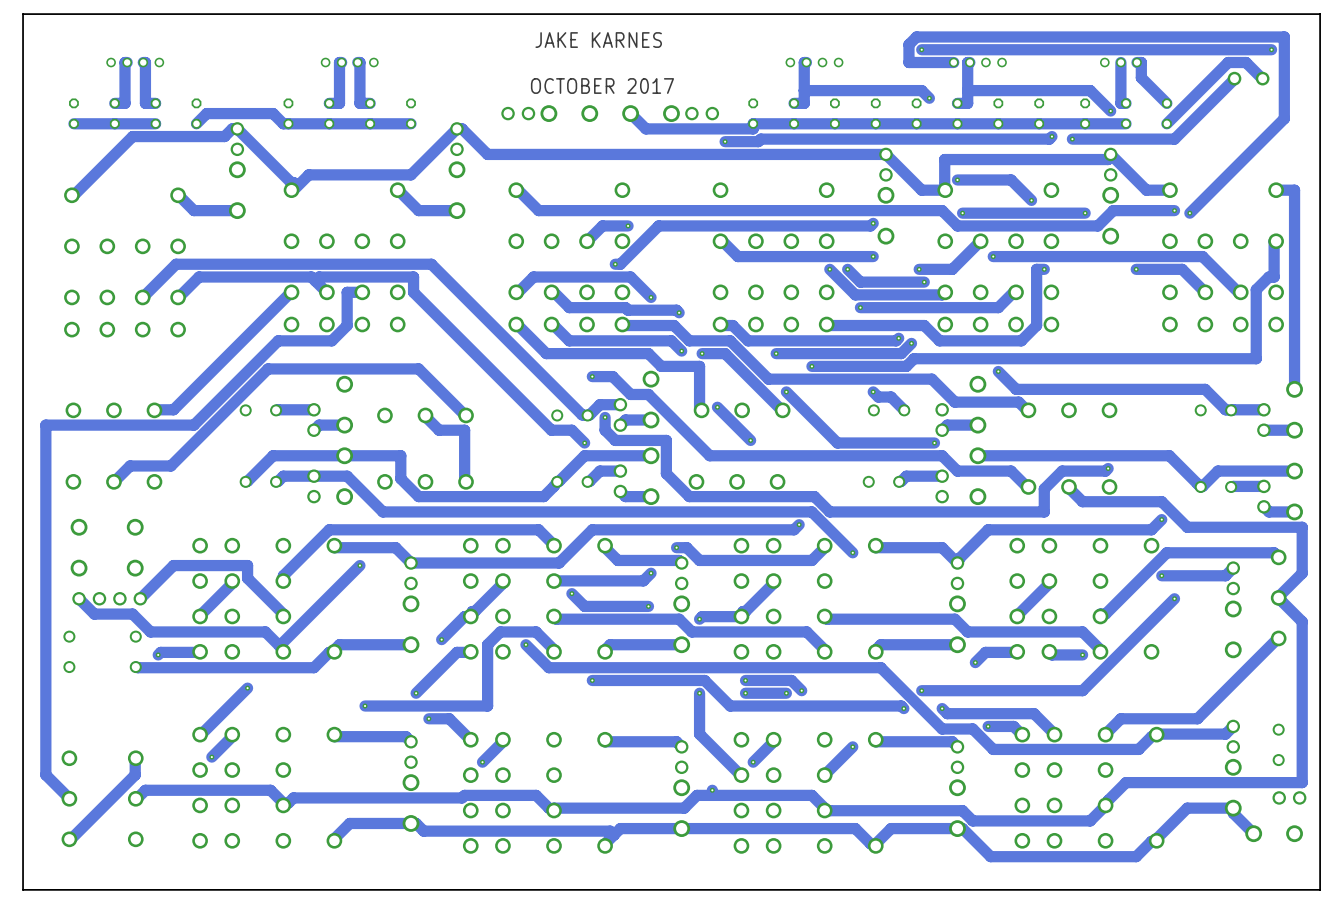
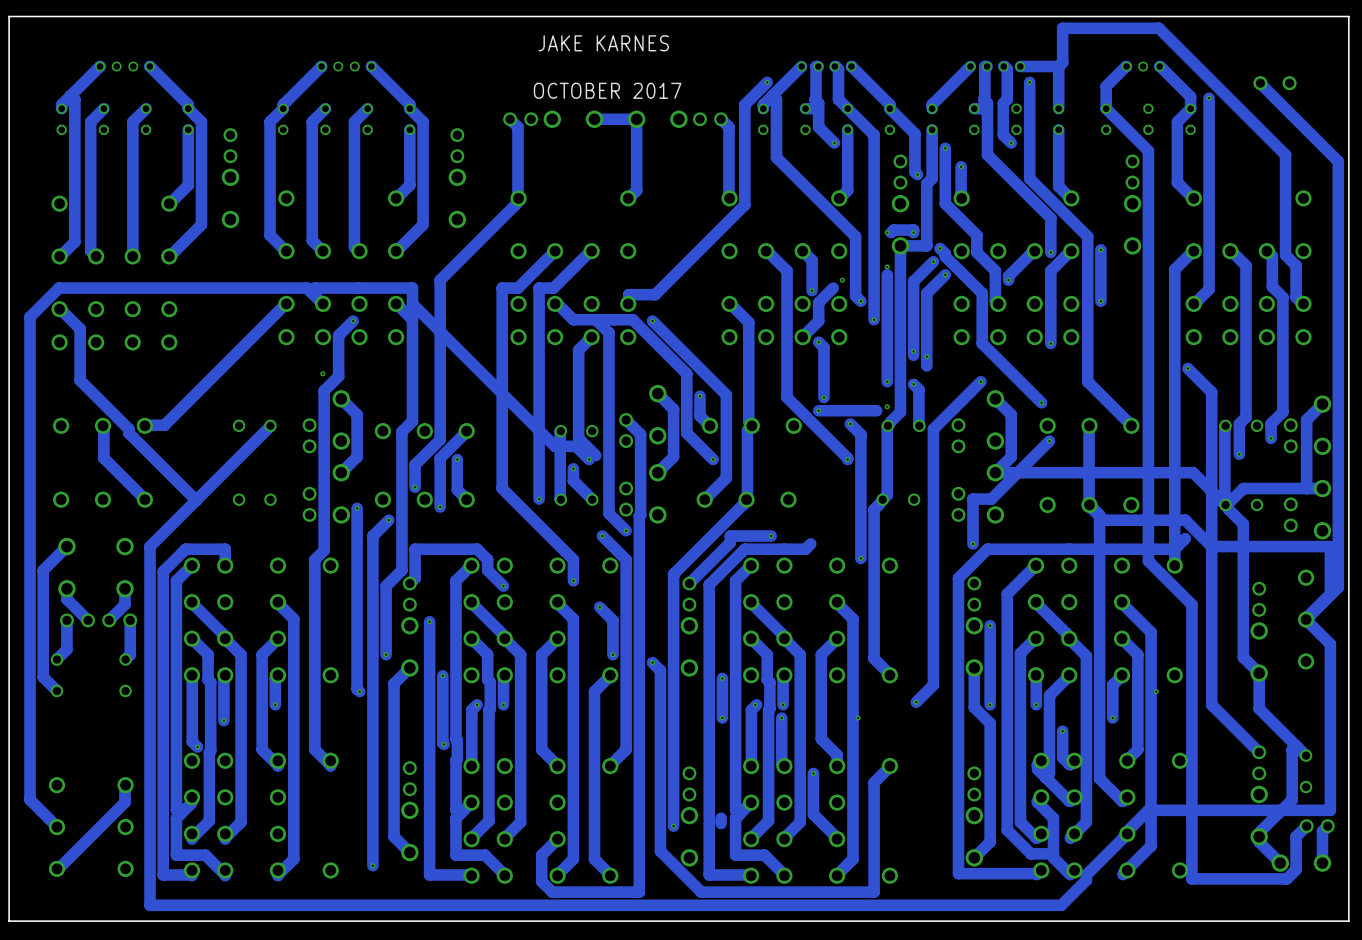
via: (921, 49) -> none
track: (1271, 49) (921, 49) -> none
via: (1271, 49) -> none
track: none -> (99, 66) (61, 104) (61, 108)
track: (127, 62) (125, 62) (125, 103) (114, 103) -> (96, 256) (90, 251) (90, 121) (103, 108)
track: (143, 62) (145, 62) (145, 103) (155, 103) -> (132, 256) (132, 121) (146, 108)
track: none -> (150, 66) (188, 104) (188, 108) (201, 121) (201, 224) (169, 256)
track: none -> (321, 66) (283, 104) (283, 108) (270, 121) (270, 235) (286, 251)
track: (341, 62) (339, 62) (339, 103) (329, 103) -> (322, 251) (312, 240) (312, 121) (325, 108)
track: (357, 62) (359, 62) (359, 103) (370, 103) -> (359, 251) (354, 247) (354, 121) (367, 108)
track: none -> (371, 66) (409, 104) (409, 108) (423, 121) (423, 224) (396, 251)
track: none -> (801, 66) (763, 104) (763, 108)
track: none -> (851, 66) (889, 104) (889, 108) (914, 133) (914, 172) (917, 174)
track: (953, 62) (908, 62) (908, 44) (916, 36) (1284, 36) (1284, 118) (1189, 213) -> (970, 66) (932, 104) (932, 108)
track: none -> (1003, 66) (1007, 69) (1007, 99) (1003, 103) (1003, 135) (1011, 143)
track: none -> (1058, 66) (1058, 108)
track: none -> (1058, 66) (1020, 66)
track: none -> (1058, 66) (1062, 62) (1062, 28) (1158, 28) (1285, 154) (1285, 255) (1296, 265) (1296, 297) (1303, 303)
track: none -> (1126, 66) (1106, 86) (1106, 108) (1148, 150) (1148, 561) (1191, 604) (1191, 878) (1286, 878) (1296, 869) (1296, 836) (1306, 826)
track: (1120, 62) (1120, 103) (1126, 103) -> none
track: (1137, 62) (1141, 62) (1141, 77) (1166, 103) -> (1160, 66) (1190, 96) (1190, 108) (1177, 121) (1177, 182) (1193, 198)
track: none -> (767, 82) (744, 104) (744, 205) (655, 294) (628, 294) (628, 303)
via: none -> (767, 82)
track: none -> (1029, 82) (1029, 178) (1087, 236) (1087, 381) (1131, 425)
via: none -> (1029, 82)
track: (1234, 78) (1174, 139) (1072, 139) -> (1260, 83) (1338, 161) (1338, 587) (1306, 619)
track: (1262, 78) (1246, 62) (1228, 62) (1166, 123) -> none
track: none -> (70, 95) (74, 99) (74, 241) (59, 256)
track: none -> (772, 95) (776, 99) (776, 157) (855, 236) (855, 296) (860, 301)
track: (804, 90) (921, 90) (929, 98) -> none
track: (967, 90) (1090, 90) (1110, 111) -> none
track: none -> (1209, 98) (1209, 289) (1193, 303)
via: none -> (1209, 98)
track: none -> (814, 99) (818, 103) (818, 127) (834, 143)
track: none -> (983, 99) (987, 103) (987, 154) (1050, 218) (1050, 252)
via: (929, 98) -> none
via: (1110, 111) -> none
track: none -> (510, 119) (517, 127) (518, 198) (516, 203) (440, 280) (440, 439) (415, 464) (415, 487)
track: none -> (594, 119) (636, 119) (636, 190) (628, 198)
track: (630, 113) (645, 128) (753, 128) (753, 123) (1126, 123) -> none
track: none -> (721, 119) (729, 127) (729, 198)
track: (155, 123) (73, 123) -> none
track: (411, 123) (283, 123) (273, 113) (206, 113) (196, 123) -> none
track: none -> (847, 129) (847, 190) (839, 198)
track: none -> (932, 129) (932, 178) (926, 183) (926, 245) (900, 245) (900, 412) (887, 426) (887, 495) (874, 509) (874, 658) (889, 674)
track: none -> (1058, 129) (1058, 186) (1071, 198)
via: none -> (834, 143)
via: none -> (1011, 143)
track: (1051, 136) (1049, 139) (760, 139) (758, 141) (725, 141) -> none
via: (1051, 136) -> none
via: (1072, 139) -> none
via: (725, 141) -> none
track: none -> (945, 148) (945, 203) (976, 235) (976, 252) (995, 270) (995, 301) (998, 303)
via: none -> (945, 148)
track: (944, 159) (1108, 159) (1110, 154) (1146, 190) (1169, 190) -> none
via: none -> (961, 166)
via: none -> (917, 174)
track: (957, 179) (1011, 179) (1031, 200) -> none
via: (957, 179) -> none
track: (398, 190) (418, 210) (456, 210) -> (396, 198) (409, 185) (409, 129)
track: (516, 190) (538, 210) (942, 210) (957, 225) (1097, 225) (1113, 210) (1174, 210) -> none
track: (944, 190) (921, 190) (885, 154) (487, 154) (462, 128) (456, 128) (411, 174) (308, 174) (291, 190) (293, 182) (290, 182) (237, 128) (232, 128) (224, 136) (132, 136) (71, 195) -> none
track: (1276, 190) (1294, 190) (1294, 389) -> (1306, 488) (1306, 419) (1322, 404)
track: (178, 195) (193, 210) (237, 210) -> (169, 203) (188, 185) (188, 129)
via: (1031, 200) -> none
via: (1174, 210) -> none
via: (962, 213) -> none
track: (1085, 213) (962, 213) -> none
via: (1085, 213) -> none
via: (1189, 213) -> none
track: (873, 223) (870, 225) (658, 225) (620, 264) (615, 264) -> none
track: none -> (913, 232) (913, 230) (893, 230) (891, 232)
via: none -> (913, 232)
track: (628, 225) (602, 225) (587, 241) -> none
via: (628, 225) -> none
track: none -> (940, 248) (945, 256) (982, 293) (982, 343) (1041, 402)
via: none -> (940, 248)
track: none -> (1100, 249) (1100, 301)
via: none -> (1100, 249)
track: none -> (555, 251) (517, 288) (502, 288) (502, 488) (573, 559) (573, 580)
track: (720, 241) (737, 256) (873, 256) -> none
track: none -> (766, 251) (787, 270) (787, 397) (847, 459)
track: none -> (802, 251) (812, 260) (812, 290)
track: (980, 241) (952, 269) (919, 269) -> none
track: none -> (1034, 251) (1008, 276) (1008, 280)
track: none -> (1071, 251) (1050, 270) (1050, 343)
track: none -> (1193, 251) (1174, 269) (1174, 565)
track: none -> (1230, 251) (1245, 265) (1245, 417) (1239, 423) (1239, 454)
track: (1276, 241) (1274, 241) (1274, 277) (1269, 277) (1256, 289) -> (1266, 251) (1272, 256) (1272, 286) (1282, 297) (1282, 301)
via: none -> (1050, 252)
track: none -> (933, 261) (913, 281) (913, 355)
via: none -> (933, 261)
track: (993, 256) (1202, 256) (1238, 292) (1240, 292) -> none
via position: (993, 256) -> (1008, 280)
via: (615, 264) -> none
track: none -> (887, 274) (887, 381)
track: none -> (945, 274) (926, 293) (926, 365)
via: none -> (945, 274)
track: (829, 269) (855, 294) (942, 294) (945, 292) -> none
track: (847, 269) (860, 282) (924, 282) -> none
via position: (847, 269) -> (860, 301)
via: (919, 269) -> none
track: (1044, 269) (1036, 269) (1036, 325) (1021, 340) (939, 340) (924, 325) (826, 324) -> none
via: (1044, 269) -> none
track: (1136, 269) (1182, 269) (1205, 292) -> none
via: (1136, 269) -> none
track: (199, 277) (178, 297) -> none
track: (536, 277) (533, 277) (516, 292) -> (539, 288) (539, 499)
track: (550, 277) (630, 277) (651, 297) -> (553, 288) (591, 251)
track: none -> (833, 288) (818, 302) (818, 321) (802, 337)
via: none -> (812, 290)
via: (924, 282) -> none
via: none -> (1100, 301)
track: (361, 292) (347, 292) (347, 325) (331, 340) (278, 340) (193, 425) (45, 425) (45, 774) -> (190, 288) (59, 288) (30, 317) (30, 799) (32, 802)
track: none -> (396, 303) (412, 319) (412, 421) (401, 431) (401, 570) (386, 586) (386, 654)
track: none -> (729, 303) (748, 322) (748, 421) (751, 425) (747, 430) (747, 499) (673, 574) (673, 826)
track: (1016, 292) (1013, 292) (998, 307) (860, 307) -> (834, 66) (838, 69) (838, 99) (874, 135) (874, 319)
track: none -> (59, 309) (80, 328) (80, 380) (128, 429) (128, 433) (196, 500)
track: (142, 297) (176, 264) (431, 264) (582, 414) (589, 414) (599, 404) (620, 404) -> (557, 839) (541, 855) (541, 881) (552, 892) (639, 892) (640, 434) (626, 419)
via position: (651, 297) -> (652, 321)
track: none -> (595, 319) (608, 332) (608, 513) (626, 530)
track: (625, 307) (628, 310) (676, 310) (679, 312) -> (631, 319) (686, 373) (686, 433) (713, 459)
track: none -> (353, 321) (338, 335) (338, 376) (324, 390) (324, 550)
via: none -> (353, 321)
track: none -> (652, 321) (726, 394) (726, 478) (704, 499)
via: (679, 312) -> none
track: (516, 324) (546, 353) (648, 353) (661, 366) (699, 366) (699, 409) (701, 410) -> (699, 396) (699, 416) (710, 425)
track: (551, 324) (569, 340) (671, 340) (681, 351) -> none
track: none -> (591, 337) (578, 350) (578, 438) (595, 455)
track: (622, 324) (674, 325) (689, 340) (730, 340) (768, 379) (931, 379) (954, 402) (1018, 402) (1028, 410) -> none
track: (720, 324) (732, 325) (748, 340) (896, 340) (898, 338) -> none
track: none -> (818, 342) (823, 347) (823, 397)
via: none -> (818, 342)
via: none -> (1050, 343)
track: (911, 343) (901, 353) (776, 353) -> none
via: (681, 351) -> none
track: (702, 353) (725, 353) (782, 410) -> none
via: (702, 353) -> none
via: (776, 353) -> none
via: none -> (1187, 368)
track: (1256, 358) (914, 358) (906, 366) (811, 366) -> (1282, 372) (1282, 412) (1271, 423) (1271, 438)
via: none -> (322, 373)
via: (811, 366) -> none
via: none -> (887, 381)
track: none -> (980, 381) (933, 429) (933, 685) (916, 702)
via: none -> (980, 381)
via: none -> (913, 384)
track: (998, 371) (1016, 389) (1205, 389) (1225, 409) (1263, 409) -> none
via: (998, 371) -> none
track: (592, 376) (612, 376) (630, 394) (648, 394) (709, 455) (942, 455) (957, 471) (1011, 471) (1028, 486) -> none
via: (592, 376) -> none
via: none -> (699, 396)
via: none -> (823, 397)
track: none -> (341, 398) (357, 414) (357, 456) (341, 472)
track: none -> (995, 398) (1011, 414) (1011, 456) (995, 472)
via: none -> (1041, 402)
track: (786, 391) (837, 442) (934, 442) -> none
via: (786, 391) -> none
track: (873, 391) (878, 397) (891, 397) (903, 409) -> (913, 384) (918, 389) (918, 425)
via: none -> (818, 410)
track: none -> (876, 410) (818, 410)
track: (717, 407) (750, 440) -> none
via: (717, 407) -> none
track: none -> (850, 423) (860, 434) (860, 558)
via: none -> (850, 423)
track: (313, 409) (276, 410) -> none
track: none -> (103, 425) (103, 458) (144, 499)
track: none -> (1089, 425) (1089, 504) (1099, 514) (1099, 778) (1123, 801)
track: none -> (1225, 425) (1224, 504) (1243, 524) (1243, 657) (1259, 673) (1259, 708) (1306, 755)
track: (425, 415) (439, 430) (464, 430) (466, 481) -> (457, 459) (457, 489) (466, 499)
track: (466, 415) (418, 368) (268, 368) (170, 465) (130, 465) (113, 481) -> (466, 431) (440, 458) (440, 507)
track: none -> (560, 431) (560, 499)
track: (605, 417) (605, 430) (615, 440) (666, 440) (666, 473) (689, 496) (814, 496) (829, 511) (1044, 511) (1044, 488) (1062, 471) (1105, 471) (1108, 468) -> none
via: (605, 417) -> none
track: (651, 420) (625, 420) (620, 425) -> none
via: none -> (1271, 438)
track: (344, 425) (319, 425) (313, 430) -> none
track: (977, 425) (947, 425) (942, 430) -> none
track: none -> (1049, 441) (991, 499) (972, 499) (972, 543)
via: none -> (1049, 441)
track: (1294, 430) (1263, 430) -> none
via: none -> (1239, 454)
via: (750, 440) -> none
via: none -> (457, 459)
via: none -> (713, 459)
via: none -> (847, 459)
via: (934, 442) -> none
via: none -> (573, 468)
track: (651, 455) (584, 455) (543, 496) (418, 496) (400, 478) (400, 455) (273, 455) (245, 481) -> (657, 472) (673, 456) (673, 409) (657, 393)
via: (1108, 468) -> none
via: none -> (415, 487)
track: (620, 471) (599, 471) (587, 481) -> (573, 468) (573, 480) (592, 499)
track: (942, 476) (906, 476) (899, 481) -> none
track: (276, 481) (283, 476) (347, 476) (382, 511) (811, 511) (852, 552) -> none
via: none -> (539, 499)
track: (1263, 486) (1231, 486) -> none
via: none -> (440, 507)
track: none -> (357, 508) (357, 689) (359, 691)
via: none -> (357, 508)
track: (620, 491) (625, 496) (651, 496) -> none
track: none -> (388, 520) (372, 536) (372, 865)
via: none -> (388, 520)
track: (1263, 506) (1269, 511) (1294, 511) -> none
via: none -> (626, 530)
via: none -> (602, 536)
via: none -> (771, 536)
via: (1161, 519) -> none
via: (799, 524) -> none
via: none -> (972, 543)
track: none -> (66, 546) (43, 570) (43, 677) (56, 690)
track: (416, 529) (328, 531) -> (415, 549) (415, 578) (409, 583)
track: (476, 529) (538, 529) (554, 545) -> (477, 549) (487, 559) (487, 570) (503, 586)
track: (735, 529) (592, 529) (559, 563) (411, 563) (395, 547) (334, 547) (334, 545) -> (744, 549) (709, 584) (709, 874) (751, 875)
track: (988, 529) (960, 557) (957, 563) (942, 547) (875, 547) (875, 545) -> (1005, 549) (987, 549) (958, 578) (958, 873) (1037, 874)
track: (319, 540) (283, 575) (283, 581) -> (314, 559) (314, 749) (330, 766)
track: none -> (191, 565) (176, 580) (176, 810) (180, 814)
track: none -> (225, 565) (225, 549) (185, 549) (163, 571) (163, 874) (191, 875)
track: none -> (471, 565) (456, 580) (456, 810) (459, 814)
track: (605, 545) (617, 560) (679, 560) (681, 563) -> (771, 536) (730, 536) (730, 542) (689, 583)
track: none -> (751, 565) (735, 580) (735, 810) (739, 814)
track: (824, 545) (811, 560) (699, 560) (686, 547) (676, 547) -> none
track: none -> (1036, 565) (1007, 594) (1007, 830) (1031, 853) (1053, 853)
via: (676, 547) -> none
via position: (852, 552) -> (860, 558)
track: (1278, 557) (1274, 552) (1166, 552) (1105, 614) (1100, 614) (1100, 616) -> none
via: none -> (573, 580)
track: (359, 565) (279, 646) -> none
via: (359, 565) -> none
via: none -> (503, 586)
track: none -> (66, 588) (66, 599) (88, 620)
track: none -> (124, 588) (124, 604) (109, 620)
track: (1233, 568) (1225, 575) (1161, 575) -> none
track: (651, 573) (643, 580) (554, 581) -> (557, 875) (573, 859) (573, 619) (557, 602)
via: (651, 573) -> none
via: (1161, 575) -> none
track: none -> (191, 602) (241, 654) (241, 822) (225, 839)
track: (232, 581) (232, 583) (200, 616) -> (191, 839) (209, 820) (210, 750) (210, 682) (208, 679) (208, 654) (191, 638)
track: none -> (277, 602) (293, 619) (293, 859) (277, 875)
track: none -> (471, 602) (520, 654) (520, 822) (504, 839)
track: (502, 581) (502, 583) (474, 611) (472, 611) (470, 616) (464, 616) (441, 639) -> none
track: none -> (751, 602) (800, 654) (800, 822) (784, 839)
track: (773, 581) (773, 583) (745, 611) (742, 611) (741, 616) (702, 616) (699, 619) -> none
track: none -> (837, 602) (852, 619) (852, 859) (837, 875)
track: none -> (1036, 602) (1086, 656) (1086, 822) (1070, 838)
track: (1049, 581) (1049, 583) (1017, 616) -> (1037, 838) (1020, 822) (1020, 653) (1036, 638)
track: none -> (1122, 602) (1151, 632) (1151, 845) (1123, 874)
track: none -> (599, 607) (612, 620) (612, 654)
via: none -> (599, 607)
track: (571, 593) (584, 606) (648, 606) -> none
via: (571, 593) -> none
track: (79, 598) (94, 614) (132, 614) (150, 631) (265, 631) (283, 651) -> (66, 620) (66, 649) (56, 659)
track: (140, 598) (173, 565) (247, 565) (247, 578) (283, 614) (283, 616) -> (130, 620) (130, 654) (125, 659)
track: (1174, 598) (1082, 690) (921, 690) -> none
via: (1174, 598) -> none
track: none -> (429, 621) (429, 874) (471, 875)
via: none -> (429, 621)
track: none -> (990, 625) (990, 704)
via: none -> (990, 625)
via: (648, 606) -> none
track: none -> (277, 638) (262, 654) (262, 749) (277, 766)
track: (554, 616) (556, 619) (679, 619) (691, 631) (806, 631) (824, 651) -> (557, 638) (541, 654) (541, 749) (557, 766)
track: none -> (751, 638) (767, 654) (767, 679) (769, 682) (768, 820) (751, 839)
track: (824, 616) (827, 619) (954, 619) (967, 631) (1082, 631) (1100, 651) -> (1112, 718) (1112, 685) (1122, 675)
track: none -> (837, 638) (821, 654) (821, 739) (837, 754) (837, 766)
via: (699, 619) -> none
via: none -> (386, 654)
via: none -> (612, 654)
track: (1278, 638) (1197, 718) (1120, 718) (1115, 723) -> (1122, 638) (1137, 654) (1137, 749)
via position: (441, 639) -> (442, 675)
via: none -> (652, 662)
track: (411, 644) (339, 644) (334, 651) (329, 652) (313, 667) (135, 667) -> (409, 667) (394, 683) (394, 836) (409, 852)
track: (525, 644) (548, 667) (880, 667) (942, 728) (972, 728) (993, 749) (1138, 749) (1156, 734) (1225, 734) (1233, 726) -> (1187, 368) (1211, 392) (1211, 704) (1259, 752)
via: (525, 644) -> none
track: (681, 644) (610, 644) (605, 651) -> (610, 874) (594, 859) (594, 691) (610, 675)
track: (957, 644) (880, 644) (875, 651) -> (974, 667) (974, 707) (990, 723) (990, 841) (974, 857)
track: (200, 651) (160, 652) (158, 654) -> (191, 675) (192, 741) (197, 747)
track: none -> (225, 675) (223, 720)
track: none -> (277, 675) (275, 678) (275, 704)
track: (470, 651) (456, 652) (416, 693) -> none
track: none -> (504, 675) (503, 704)
track: (554, 651) (536, 631) (500, 631) (487, 644) (487, 685) -> (471, 638) (487, 654) (487, 679) (490, 682) (488, 710)
track: none -> (784, 675) (783, 704)
track: (1017, 651) (985, 652) (975, 662) -> (1036, 675) (1036, 704)
track: none -> (442, 675) (444, 744)
track: (1049, 652) (1051, 654) (1082, 654) -> (1069, 675) (1049, 695) (1049, 773) (1045, 777)
via: (158, 654) -> none
track: none -> (722, 678) (722, 718)
via: none -> (722, 678)
via: (1082, 654) -> none
via position: (975, 662) -> (990, 704)
via: none -> (359, 691)
via: none -> (1156, 691)
via: none -> (916, 702)
via: none -> (275, 704)
via: none -> (477, 704)
via: none -> (503, 704)
track: (592, 680) (704, 680) (730, 706) (901, 706) (903, 708) -> none
via: (592, 680) -> none
track: (745, 680) (791, 680) (801, 690) -> none
track: none -> (756, 704) (751, 710) (751, 766)
via: none -> (783, 704)
via: none -> (1036, 704)
track: (247, 688) (200, 734) -> none
via: (247, 688) -> none
via: (801, 690) -> none
via: (921, 690) -> none
via: (416, 693) -> none
track: (699, 693) (699, 734) (741, 775) -> (784, 875) (764, 855) (735, 855) (735, 818) (751, 802)
via position: (699, 693) -> (722, 718)
via: (745, 693) -> none
via: none -> (781, 718)
track: (786, 693) (745, 693) -> none
via: (786, 693) -> none
via: none -> (858, 718)
via: none -> (1112, 718)
via: none -> (223, 720)
via: (365, 706) -> none
track: (487, 706) (365, 706) -> (488, 731) (488, 820) (471, 839)
track: none -> (1062, 731) (1062, 757) (1070, 765)
via: none -> (1062, 731)
via: (903, 708) -> none
track: (942, 708) (947, 713) (1034, 713) (1054, 734) -> none
via: (942, 708) -> none
track: (428, 718) (449, 718) (470, 739) -> (477, 704) (471, 710) (471, 766)
via position: (428, 718) -> (444, 744)
via: none -> (197, 747)
track: (988, 726) (1013, 726) (1022, 734) -> none
via: (988, 726) -> none
track: (232, 734) (211, 757) -> none
track: (334, 734) (334, 736) (405, 736) (411, 741) -> none
track: none -> (1037, 765) (1037, 769) (1070, 801)
track: (502, 739) (482, 762) -> none
track: (605, 739) (605, 741) (676, 741) (681, 746) -> (610, 766) (626, 749) (626, 559) (602, 536)
track: (773, 739) (753, 762) -> (784, 766) (781, 762) (781, 718)
track: (875, 740) (952, 741) (957, 746) -> (889, 766) (874, 782) (874, 892) (701, 892) (660, 851) (660, 670) (652, 662)
via: none -> (813, 773)
track: (852, 746) (824, 775) -> none
via: (852, 746) -> none
via: (211, 757) -> none
via: (482, 762) -> none
via: (753, 762) -> none
track: none -> (1037, 801) (1053, 818) (1053, 857) (1070, 874)
track: none -> (191, 802) (176, 818) (176, 855) (205, 855) (225, 875)
track: none -> (471, 802) (456, 818) (456, 855) (485, 855) (504, 875)
via position: (712, 790) -> (673, 826)
track: none -> (1327, 826) (1322, 831) (1322, 863)
track: (135, 798) (145, 790) (270, 790) (283, 803) (283, 805) (293, 797) (462, 797) (464, 795) (536, 795) (554, 810) (554, 808) (684, 808) (697, 795) (811, 795) (824, 809) -> (813, 773) (813, 814) (837, 838)
track: (1233, 808) (1187, 808) (1156, 840) (1151, 841) (1136, 856) (990, 856) (962, 828) (891, 828) (875, 845) (870, 843) (855, 828) (620, 828) (605, 845) -> (1259, 836) (1260, 831) (1292, 799) (1292, 749) (1296, 745)
track: (824, 810) (962, 810) (972, 820) (1090, 820) -> (270, 425) (150, 546) (150, 905) (1061, 905) (1086, 880) (1086, 874) (1111, 849)
track: (614, 834) (610, 831) (423, 831) (416, 823) (349, 823) (334, 840) -> none
via: none -> (372, 865)

